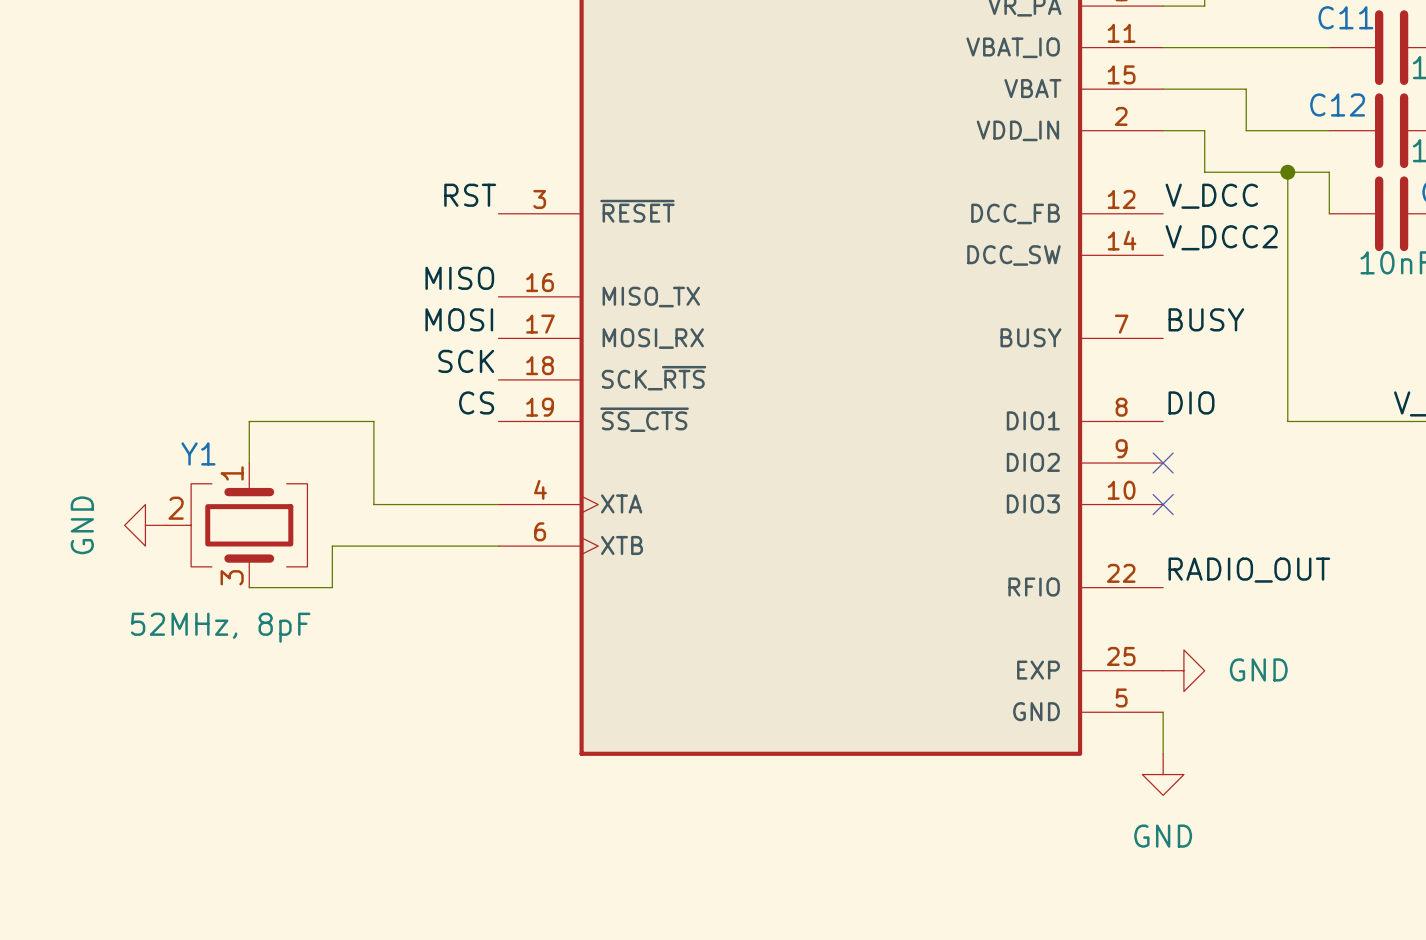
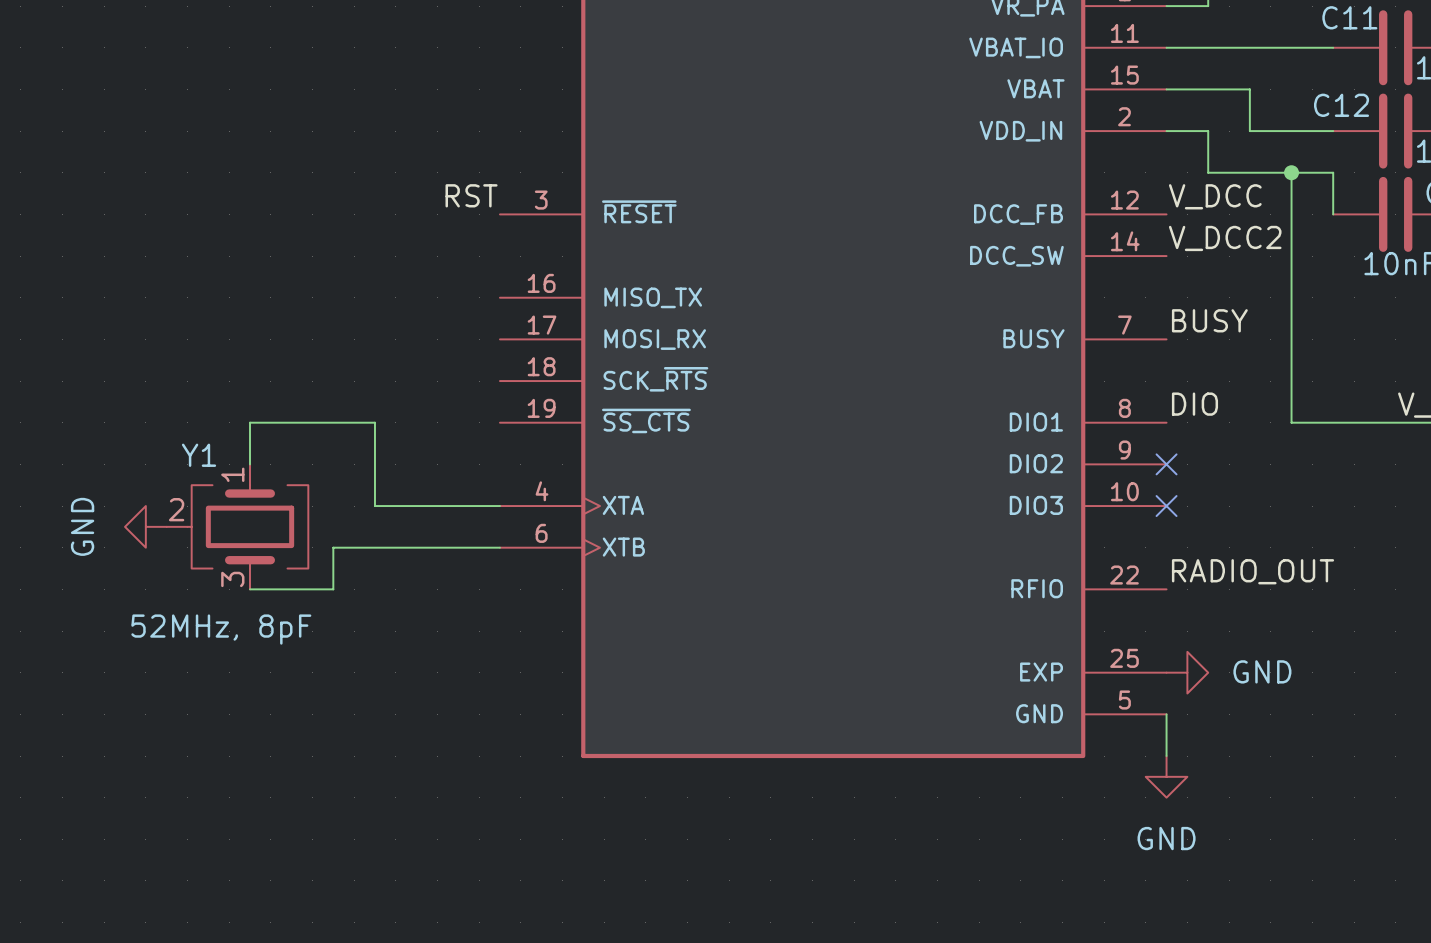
label: MISO (459, 278) -> none
label: MOSI (459, 319) -> none
label: SCK (466, 361) -> none
label: CS (476, 402) -> none

